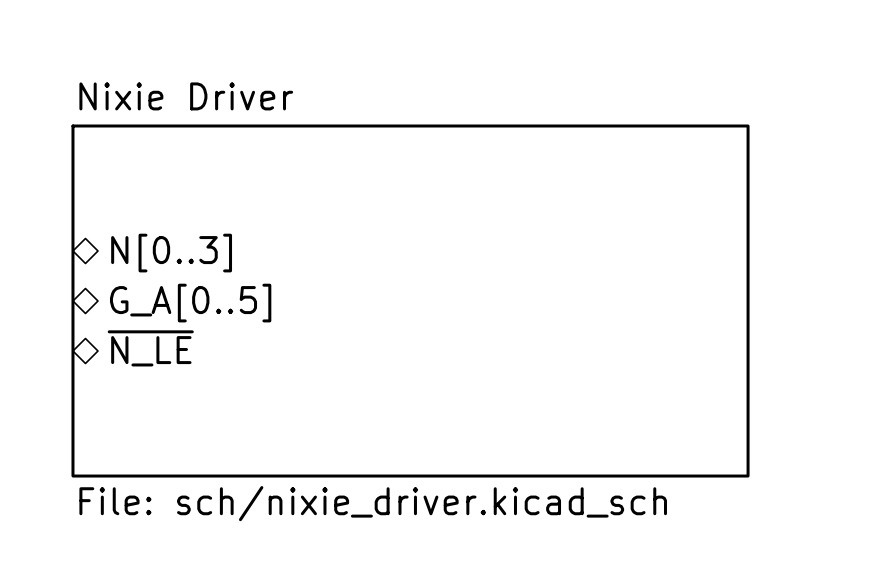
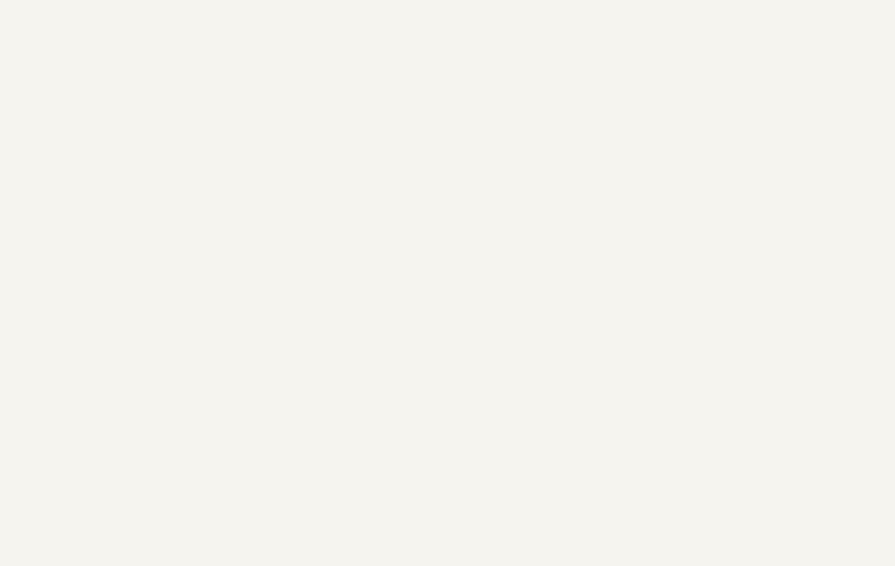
sheet pin: N[0..3] (171, 253) -> none
sheet Nixie Driver: File: sch/nixie_driver.kicad_sch (410, 301) -> none
sheet pin: G_A[0..5] (190, 303) -> none
sheet pin: ~{N_LE} (150, 348) -> none

